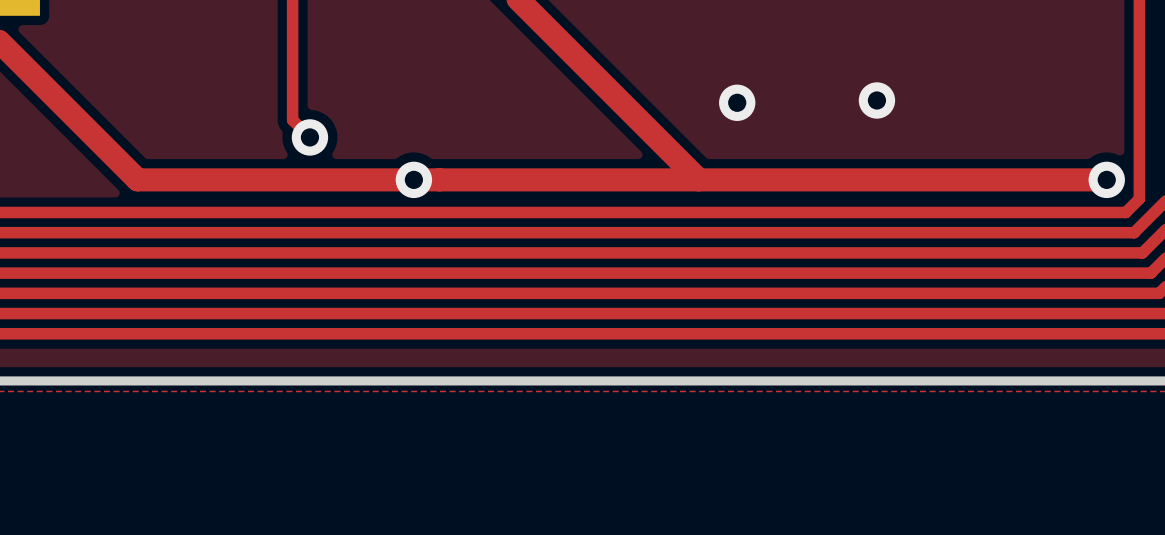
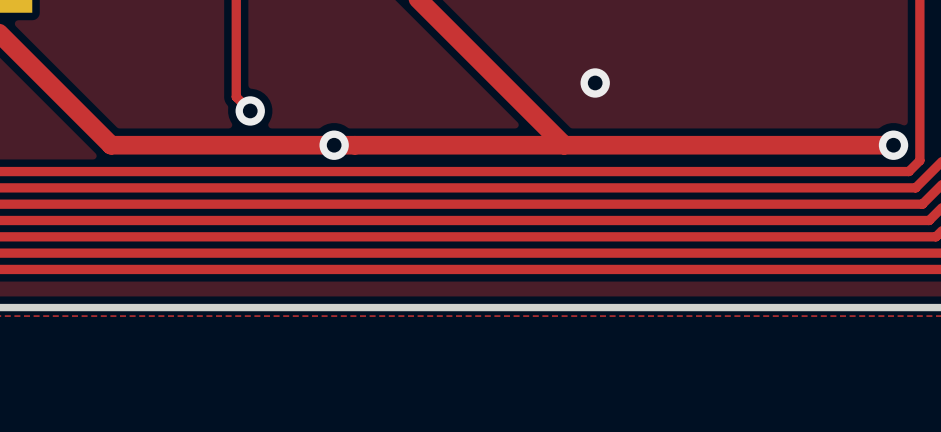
via: (876, 100) -> none

